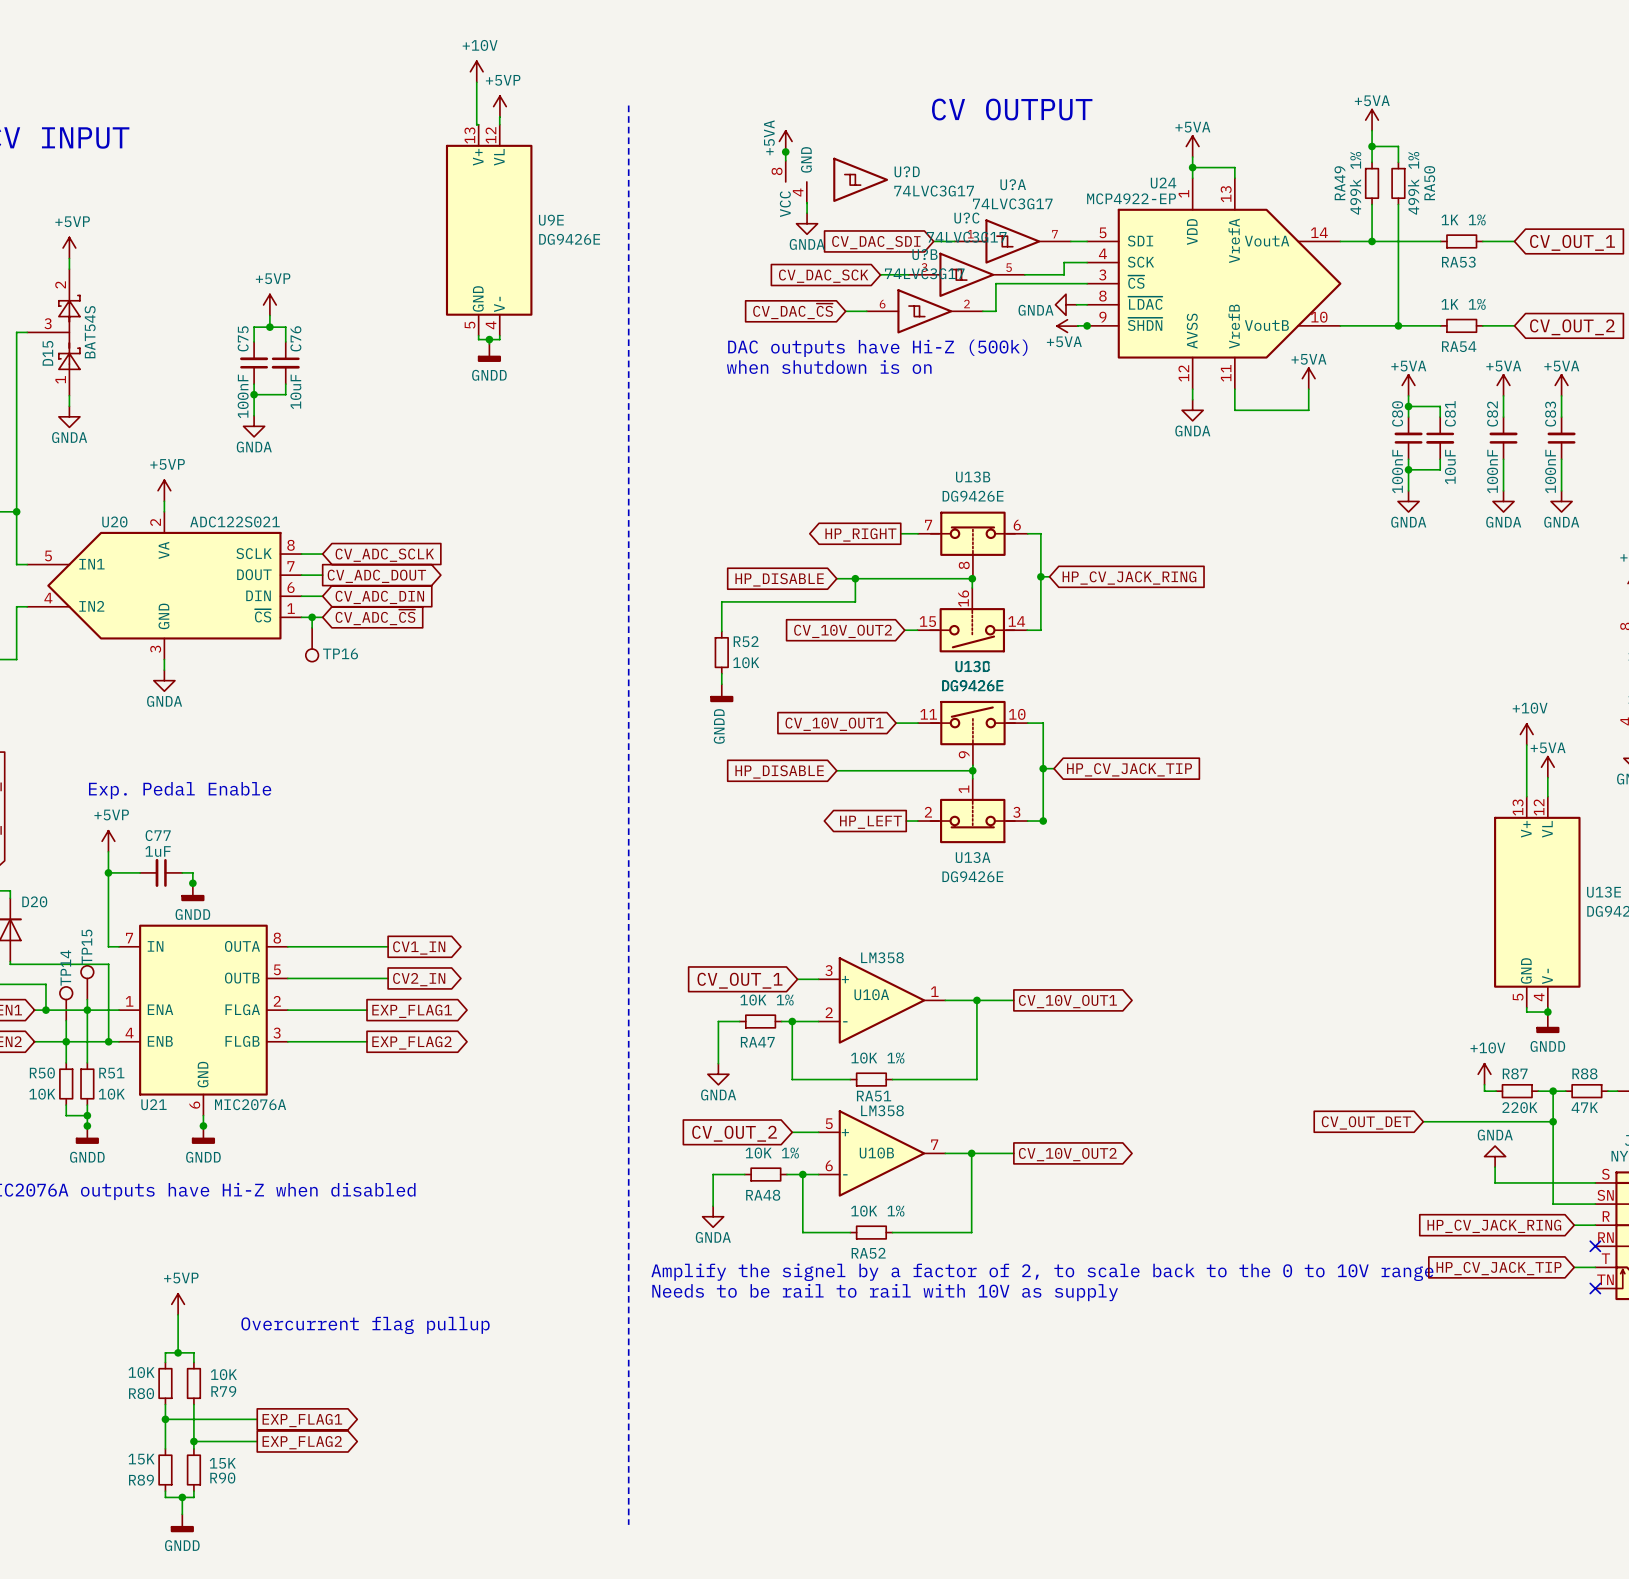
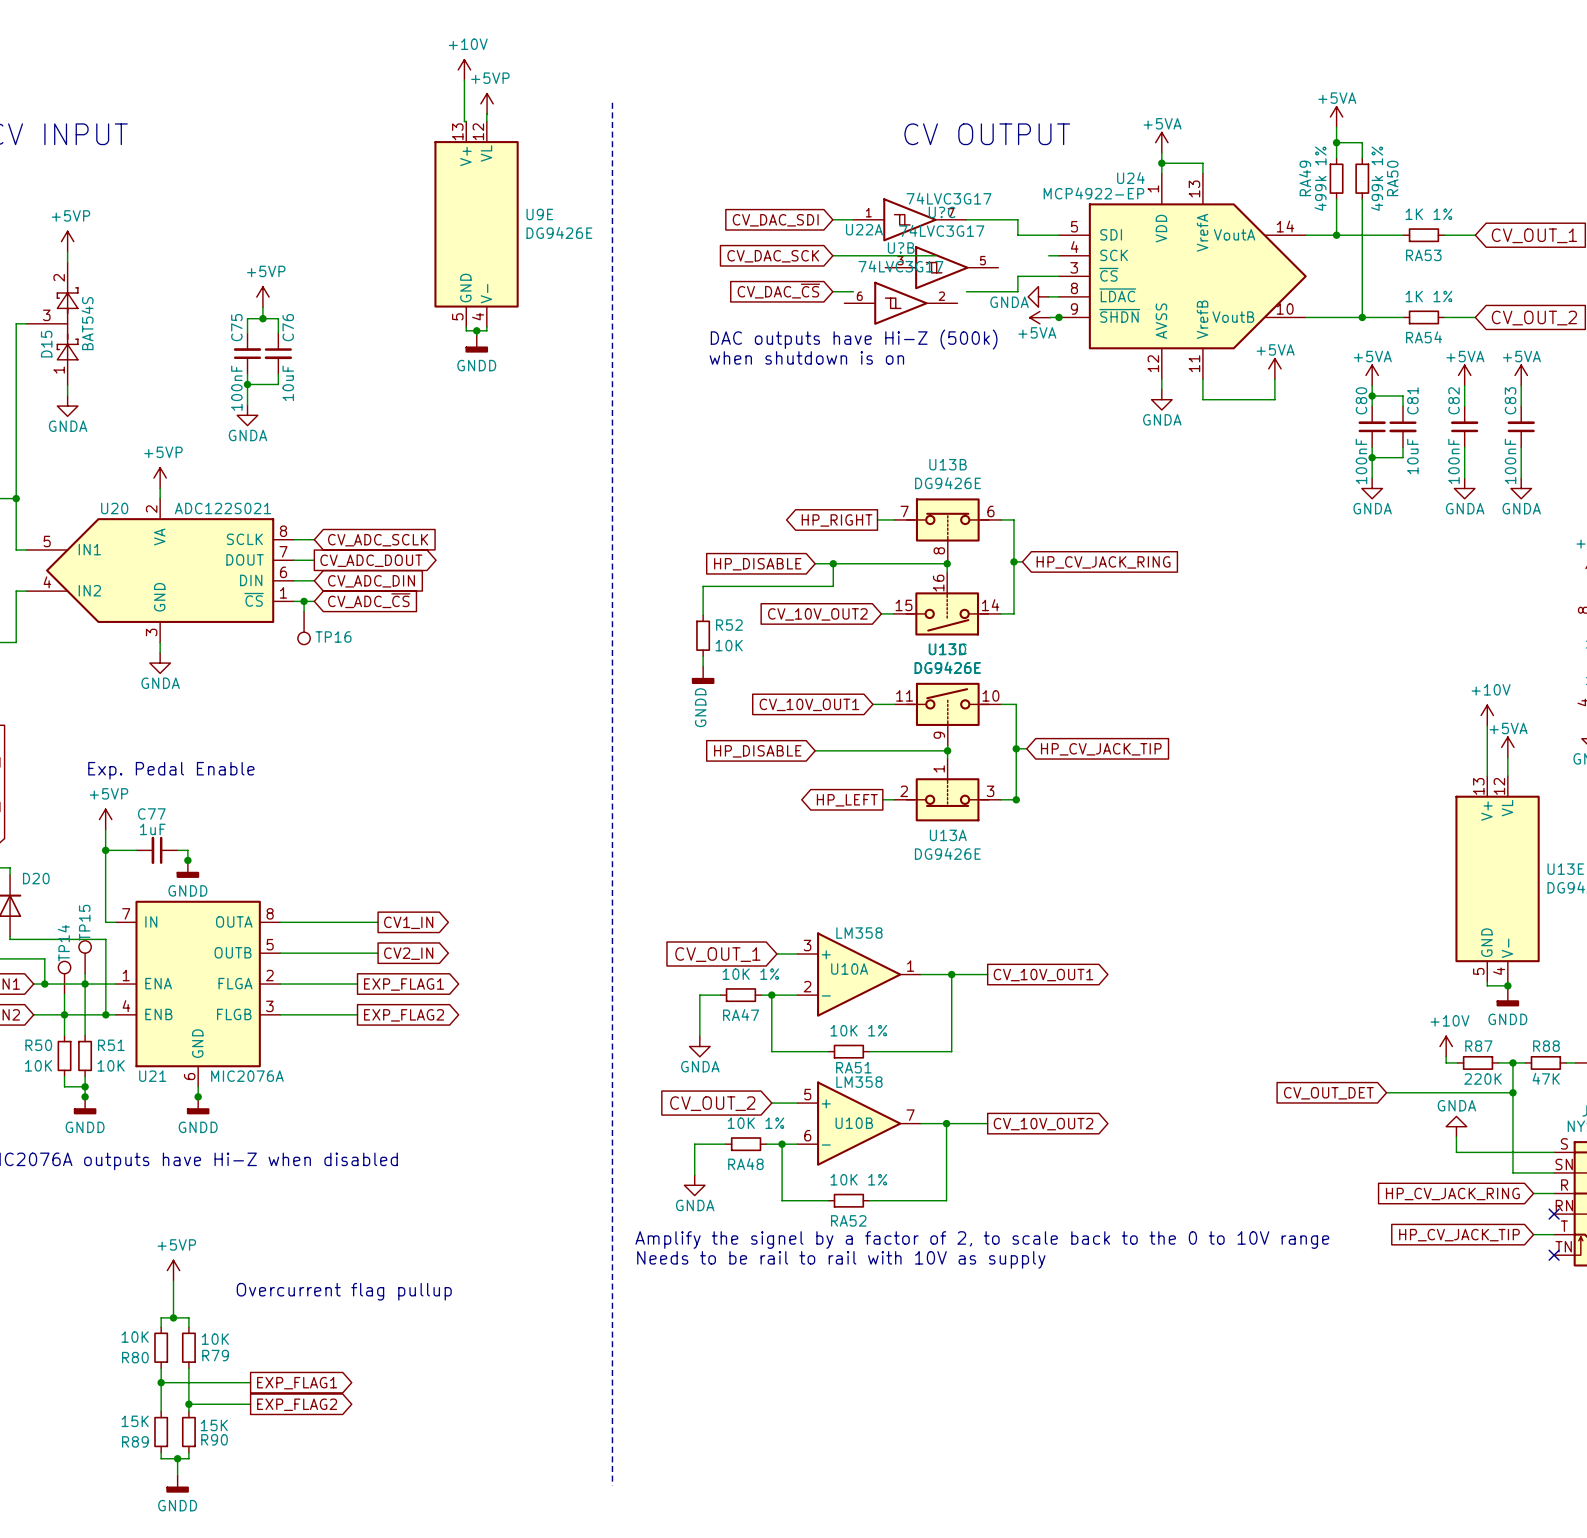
text position: CV OUTPUT (1012, 109) -> CV OUTPUT (987, 134)
power symbol: +5VA (785, 141) -> none
wire: (785, 151) (785, 160) -> none
junction: (785, 151) -> none
U?D: 74LVC3G17 (836, 180) -> none
wire: (806, 203) (807, 213) -> none
power symbol: GNDA (807, 223) -> none
U22A: none -> 74LVC3G17 (909, 219)
wire: none -> (966, 219) (1017, 219) (1017, 235) (1043, 235)
wire: (933, 241) (954, 241) -> (832, 219) (853, 219)
U?A: 74LVC3G17 (1012, 241) -> none
global label position: CV_DAC_SDI (876, 242) -> CV_DAC_SDI (775, 220)
wire: none -> (832, 255) (935, 255)
wire: (1076, 262) (1064, 262) (1064, 274) (1024, 274) -> none
wire: (908, 274) (880, 275) -> none
global label position: CV_DAC_SCK (823, 276) -> CV_DAC_SCK (773, 256)
wire: (1044, 283) (995, 283) (995, 311) (982, 311) -> (1017, 276) (1017, 291) (966, 291)
global label position: CV_DAC_~{CS} (793, 311) -> CV_DAC_~{CS} (778, 291)
wire: (845, 311) (866, 311) -> (832, 291) (853, 291)

